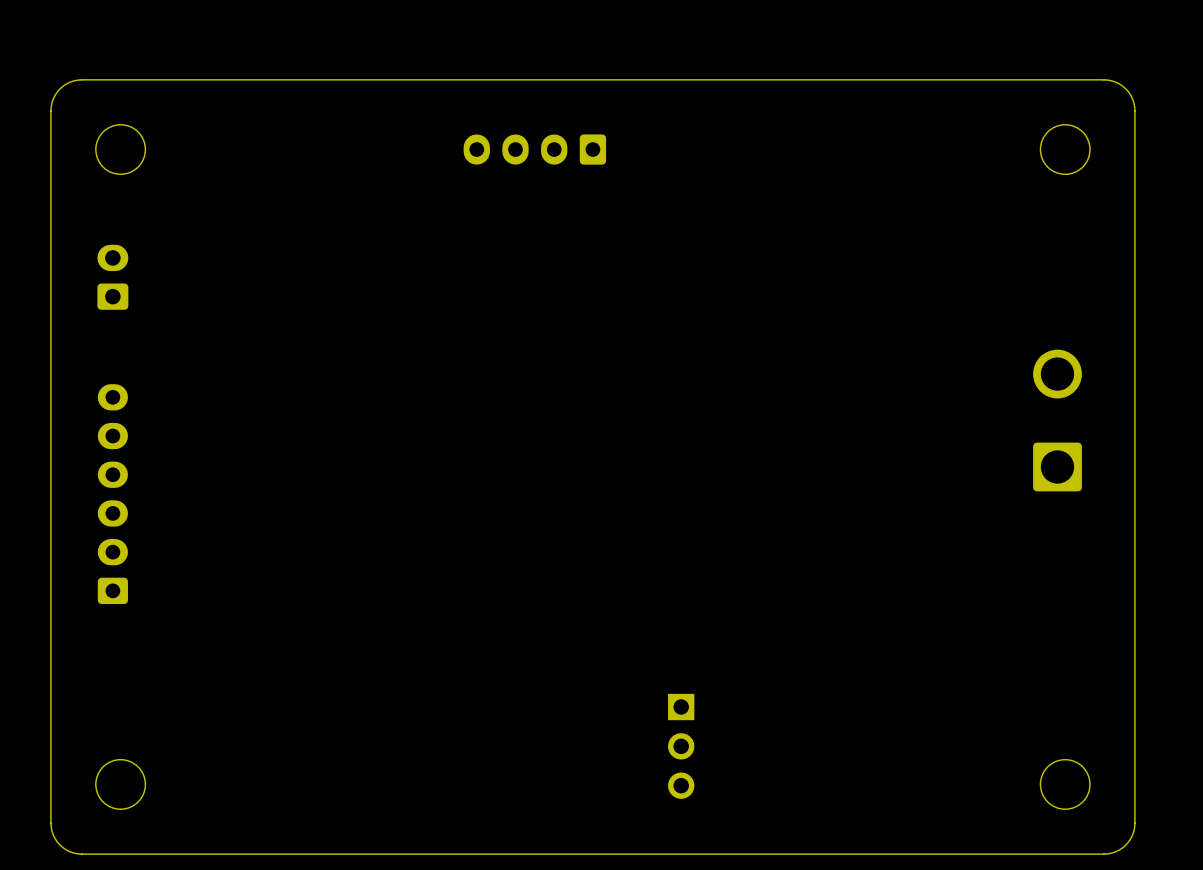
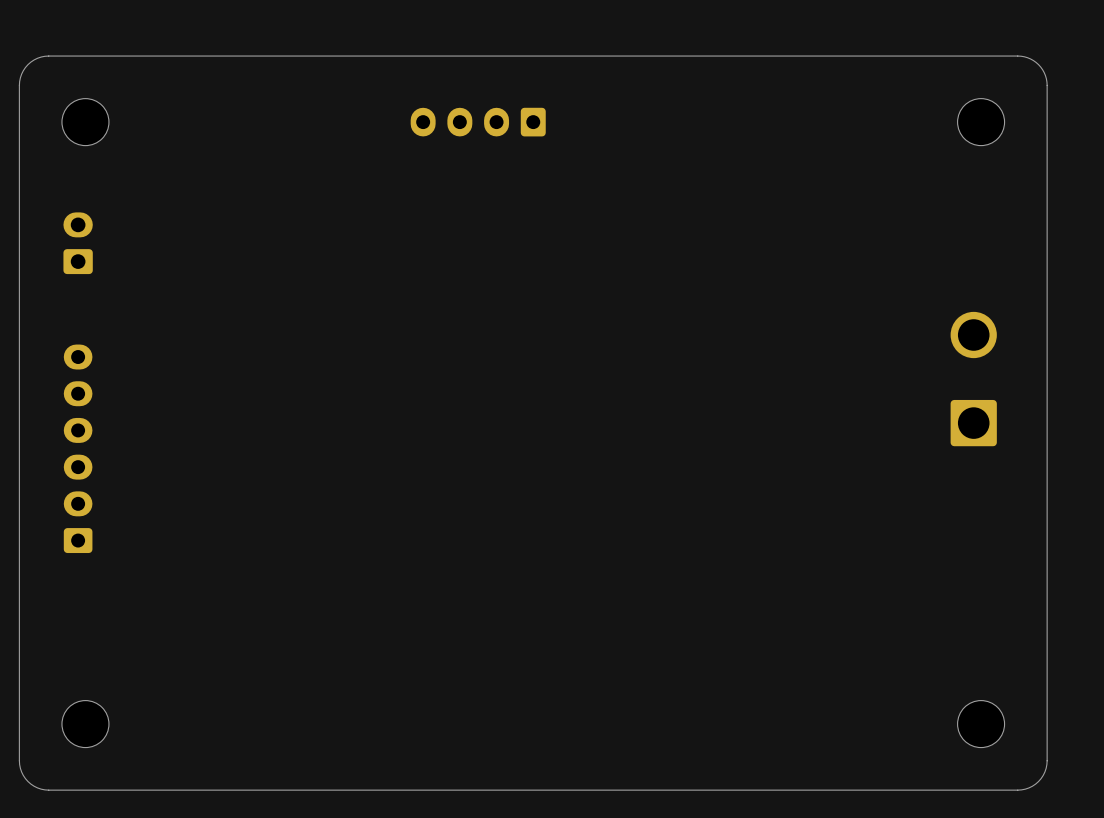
part: (681, 746) -> none

